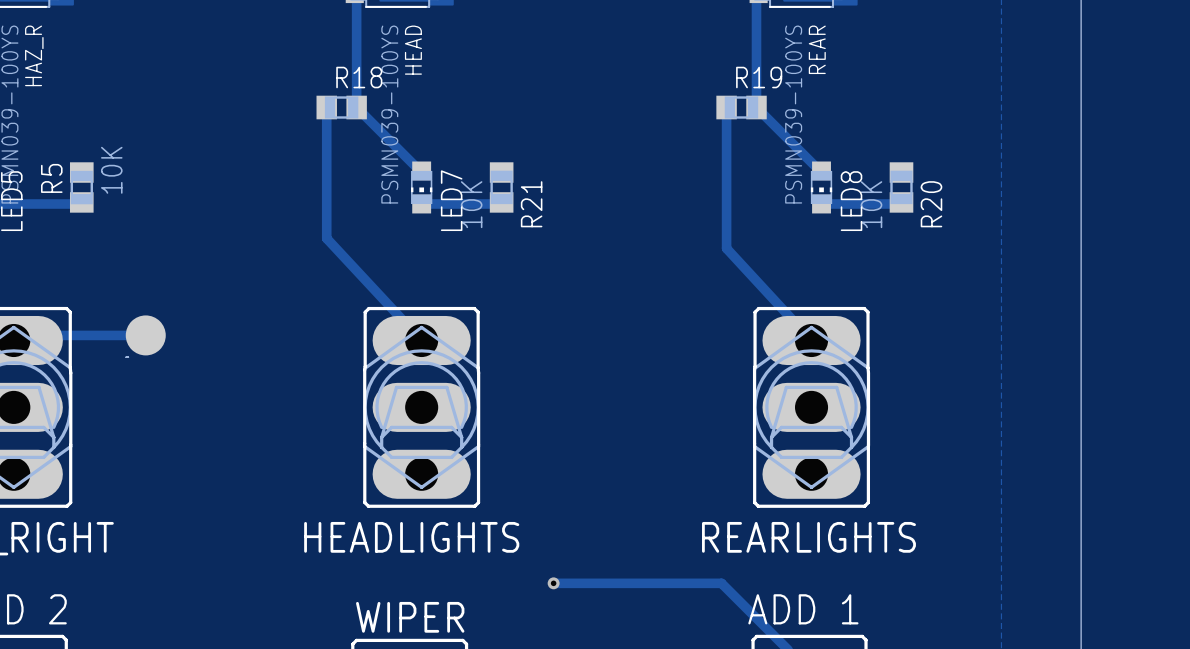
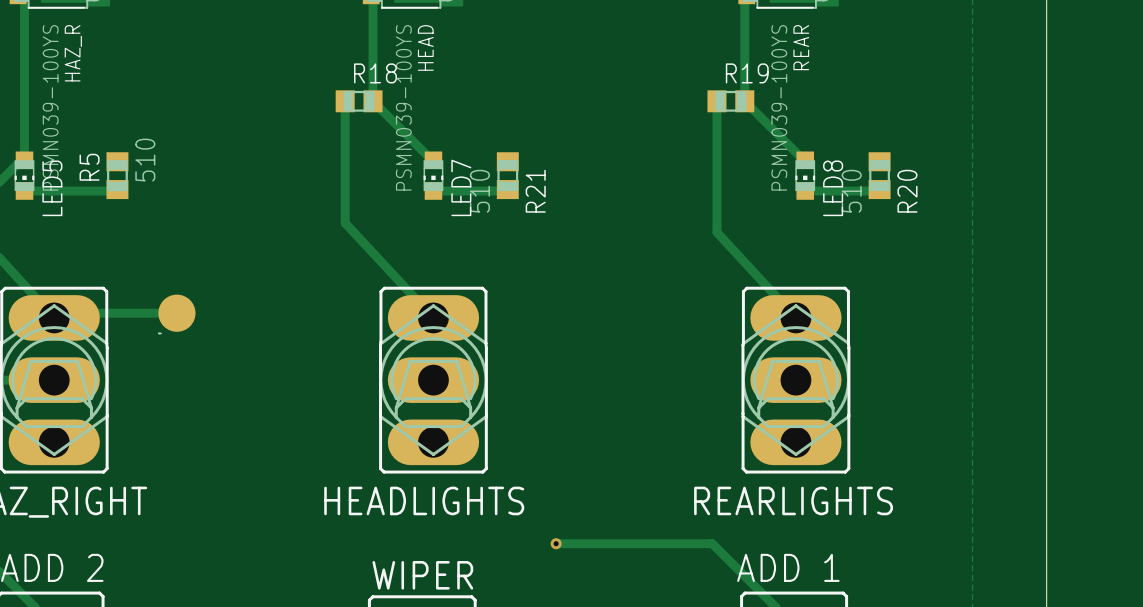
R5 value: 10K (111, 170) -> 510 (145, 160)
R21 value: 10K (471, 204) -> 510 (479, 191)
R20 value: 10K (871, 204) -> 510 (851, 191)

